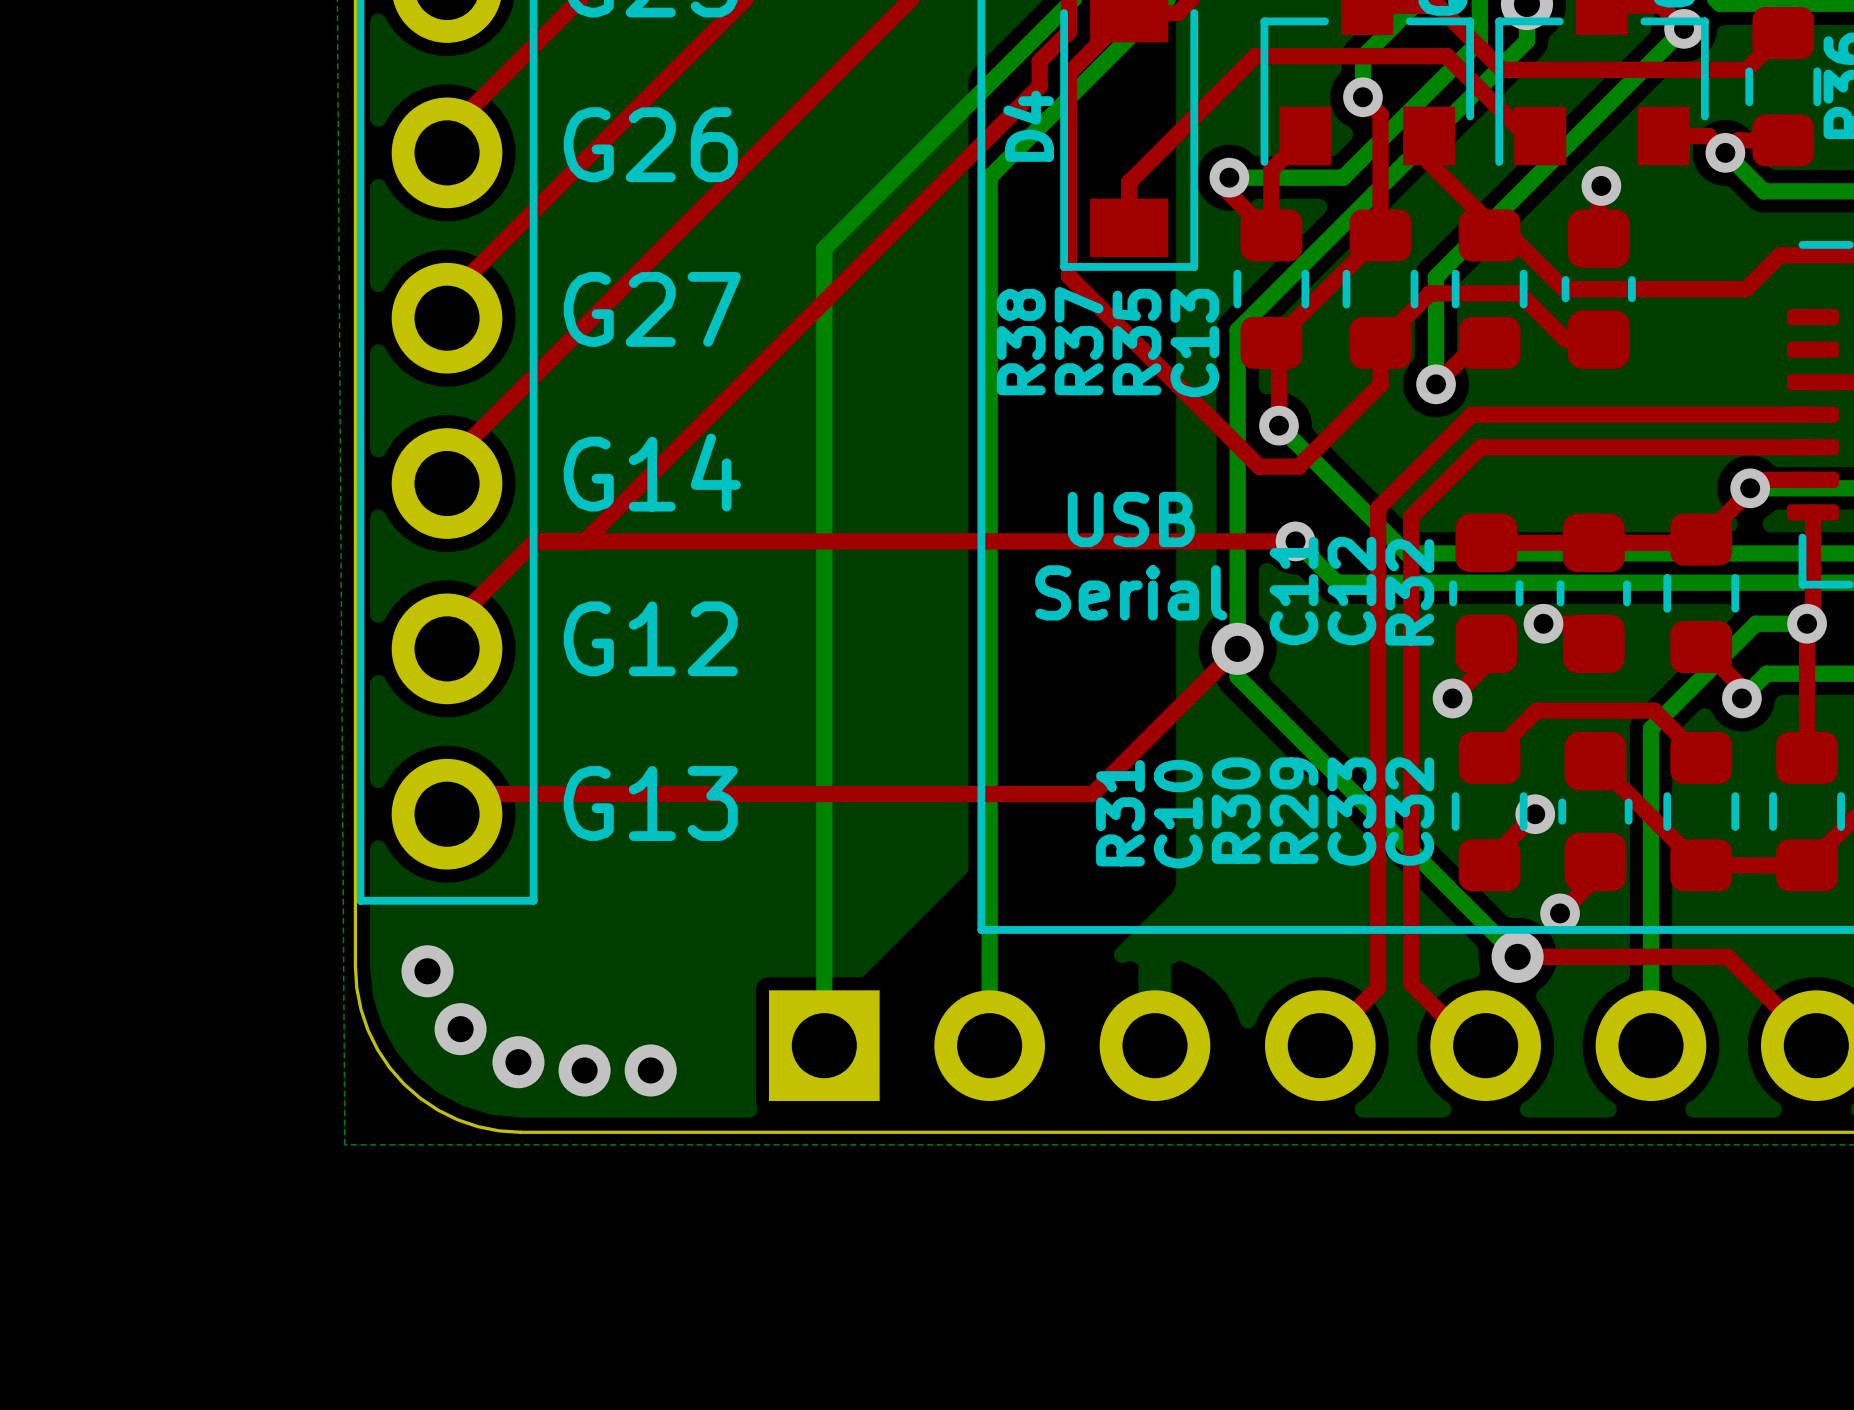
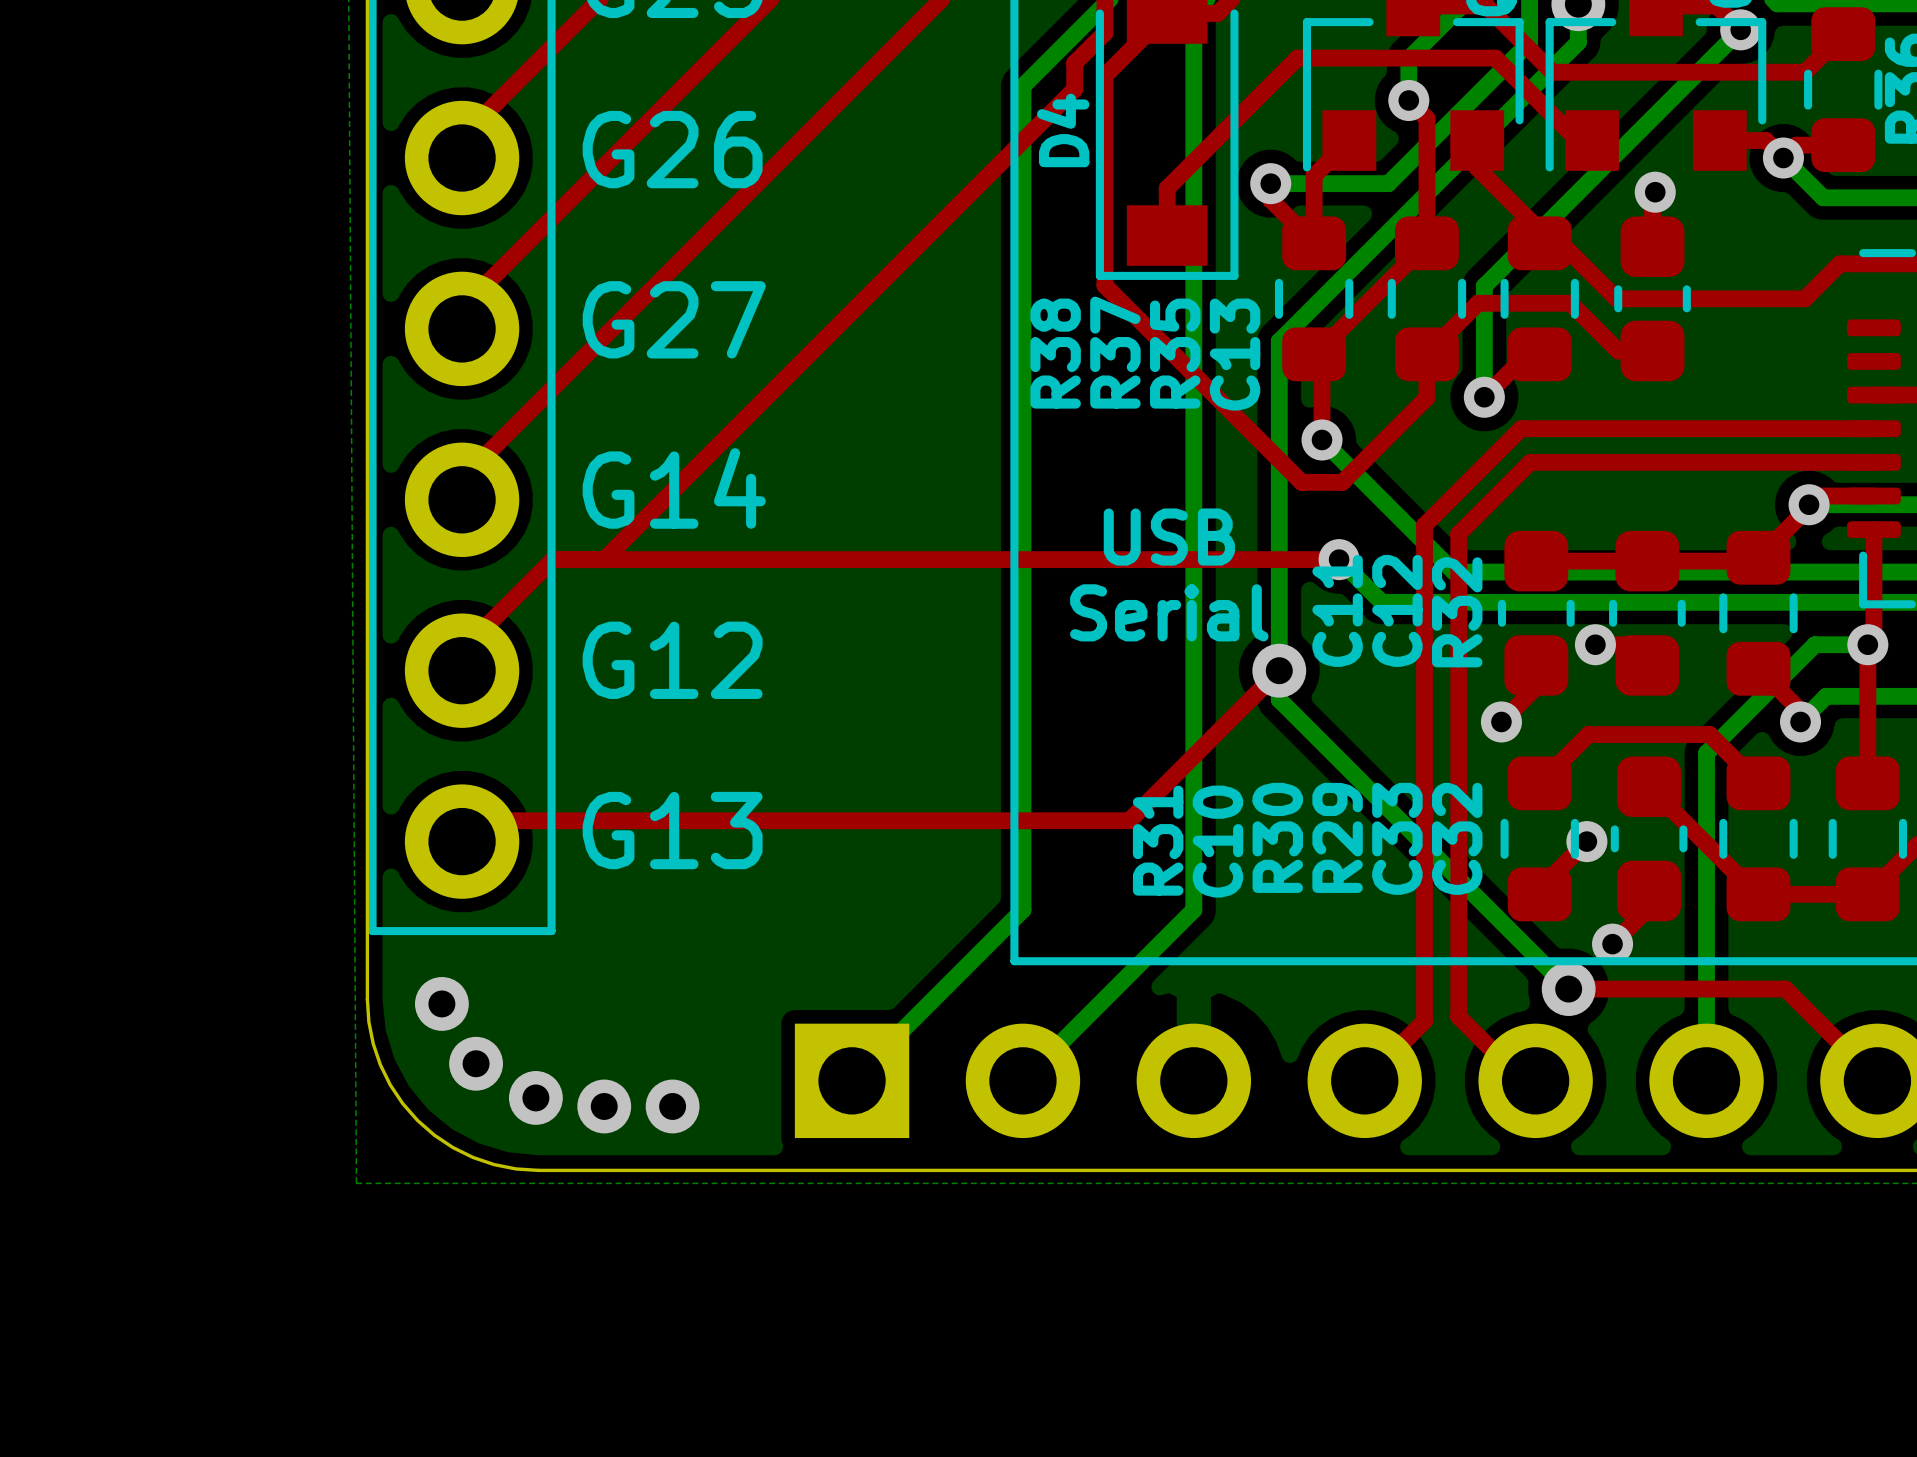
bottom track: (1154, 11) (989, 177) -> (1022, 86) (1022, 183)
bottom track: none -> (1193, 12) (1193, 909) (1022, 1080)
bottom track: (989, 83) (824, 248) (824, 1045) -> none
bottom track: (989, 880) (989, 1045) -> (1022, 909) (852, 1080)

